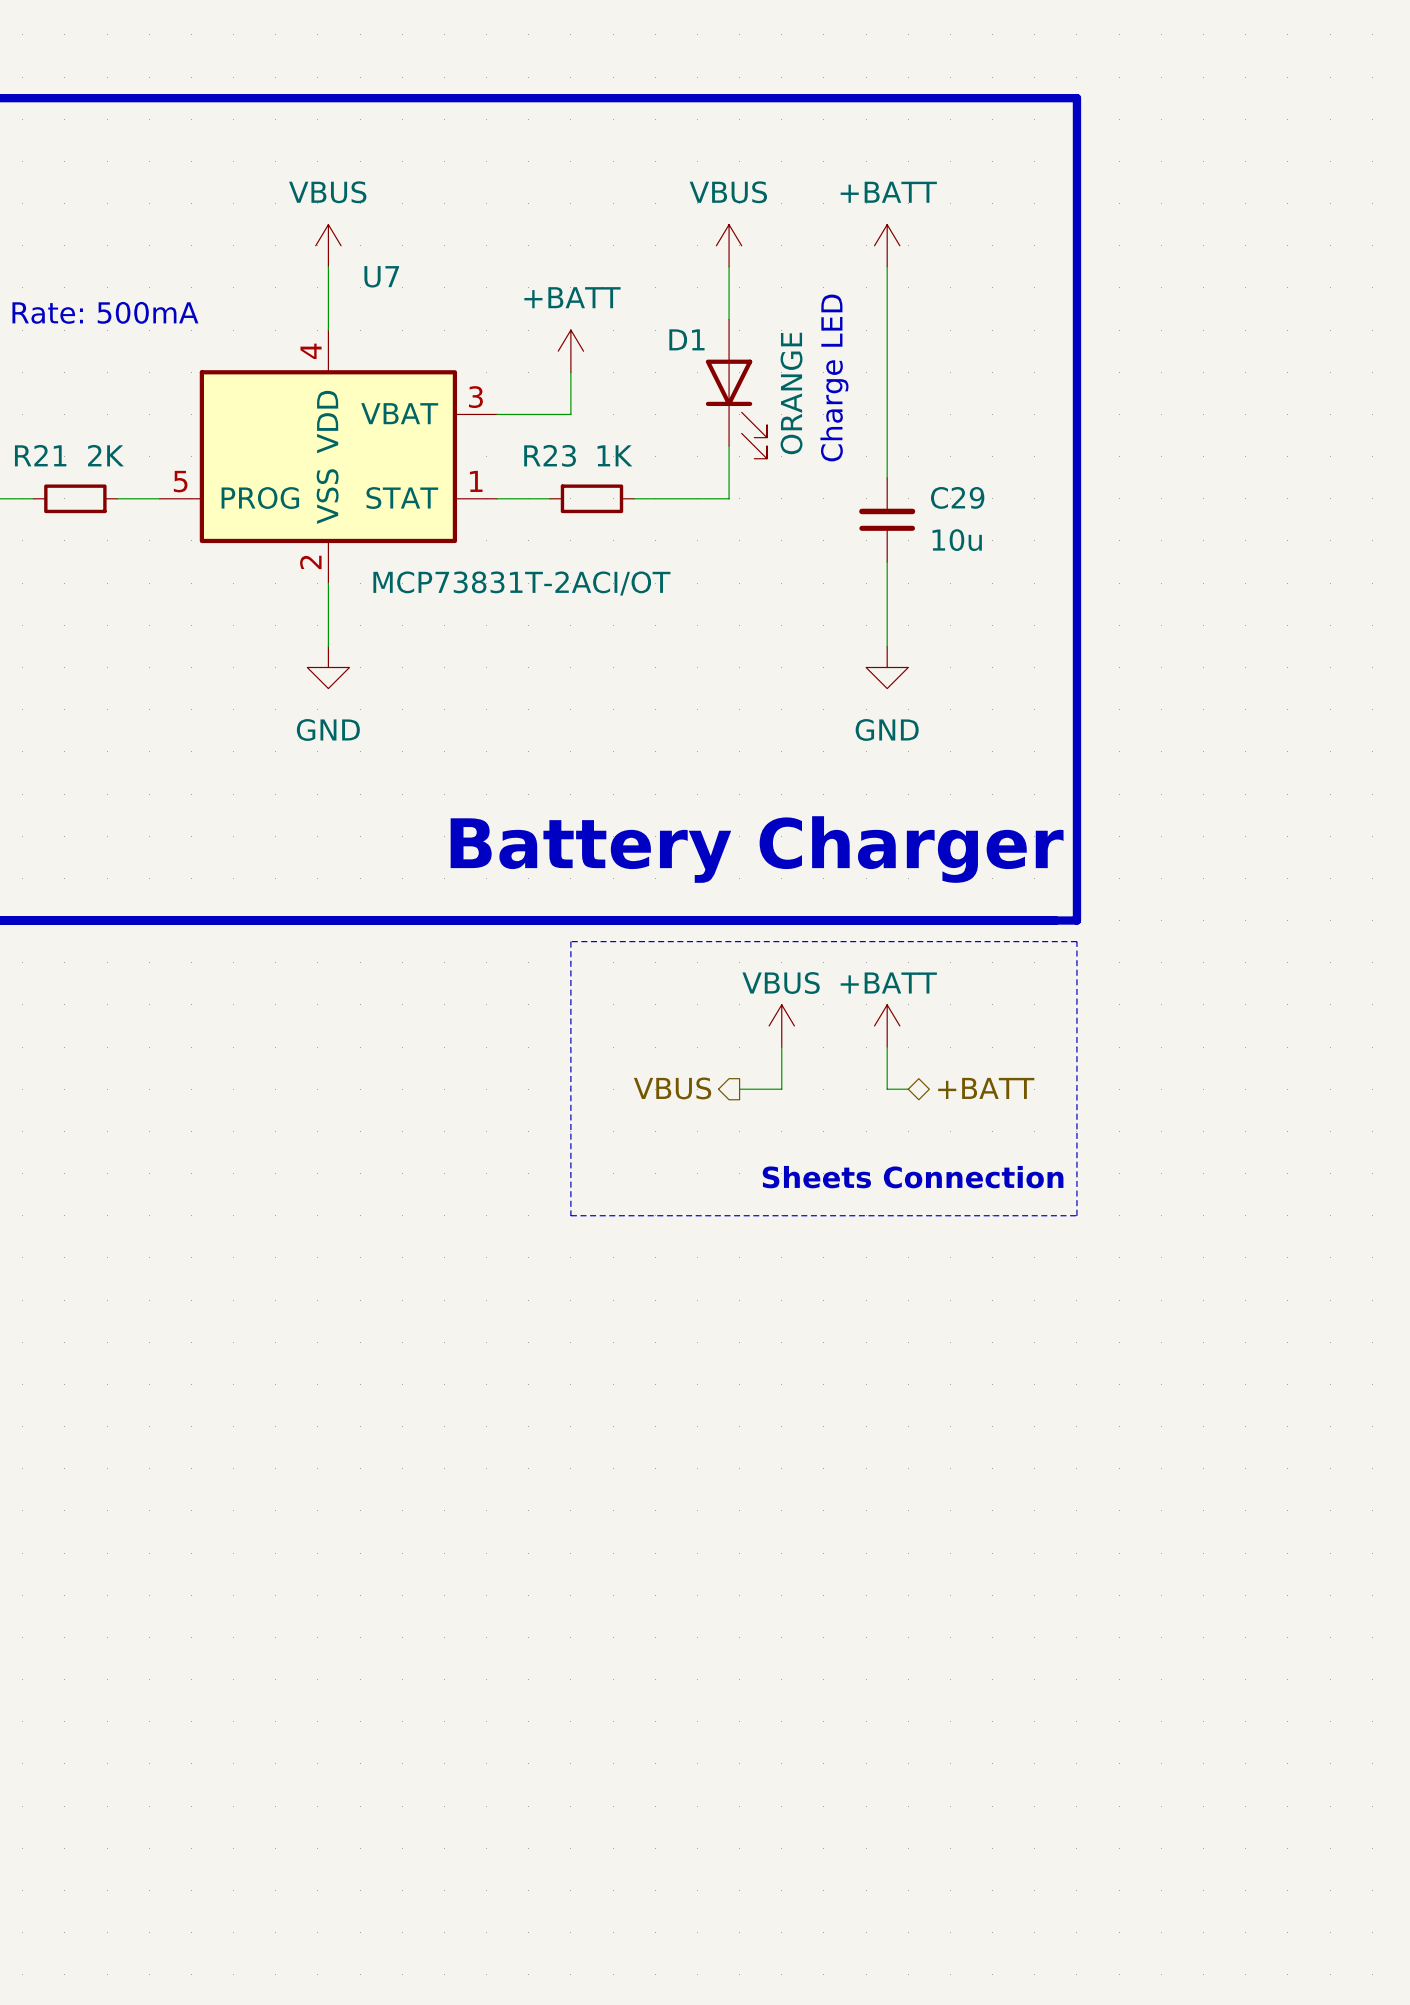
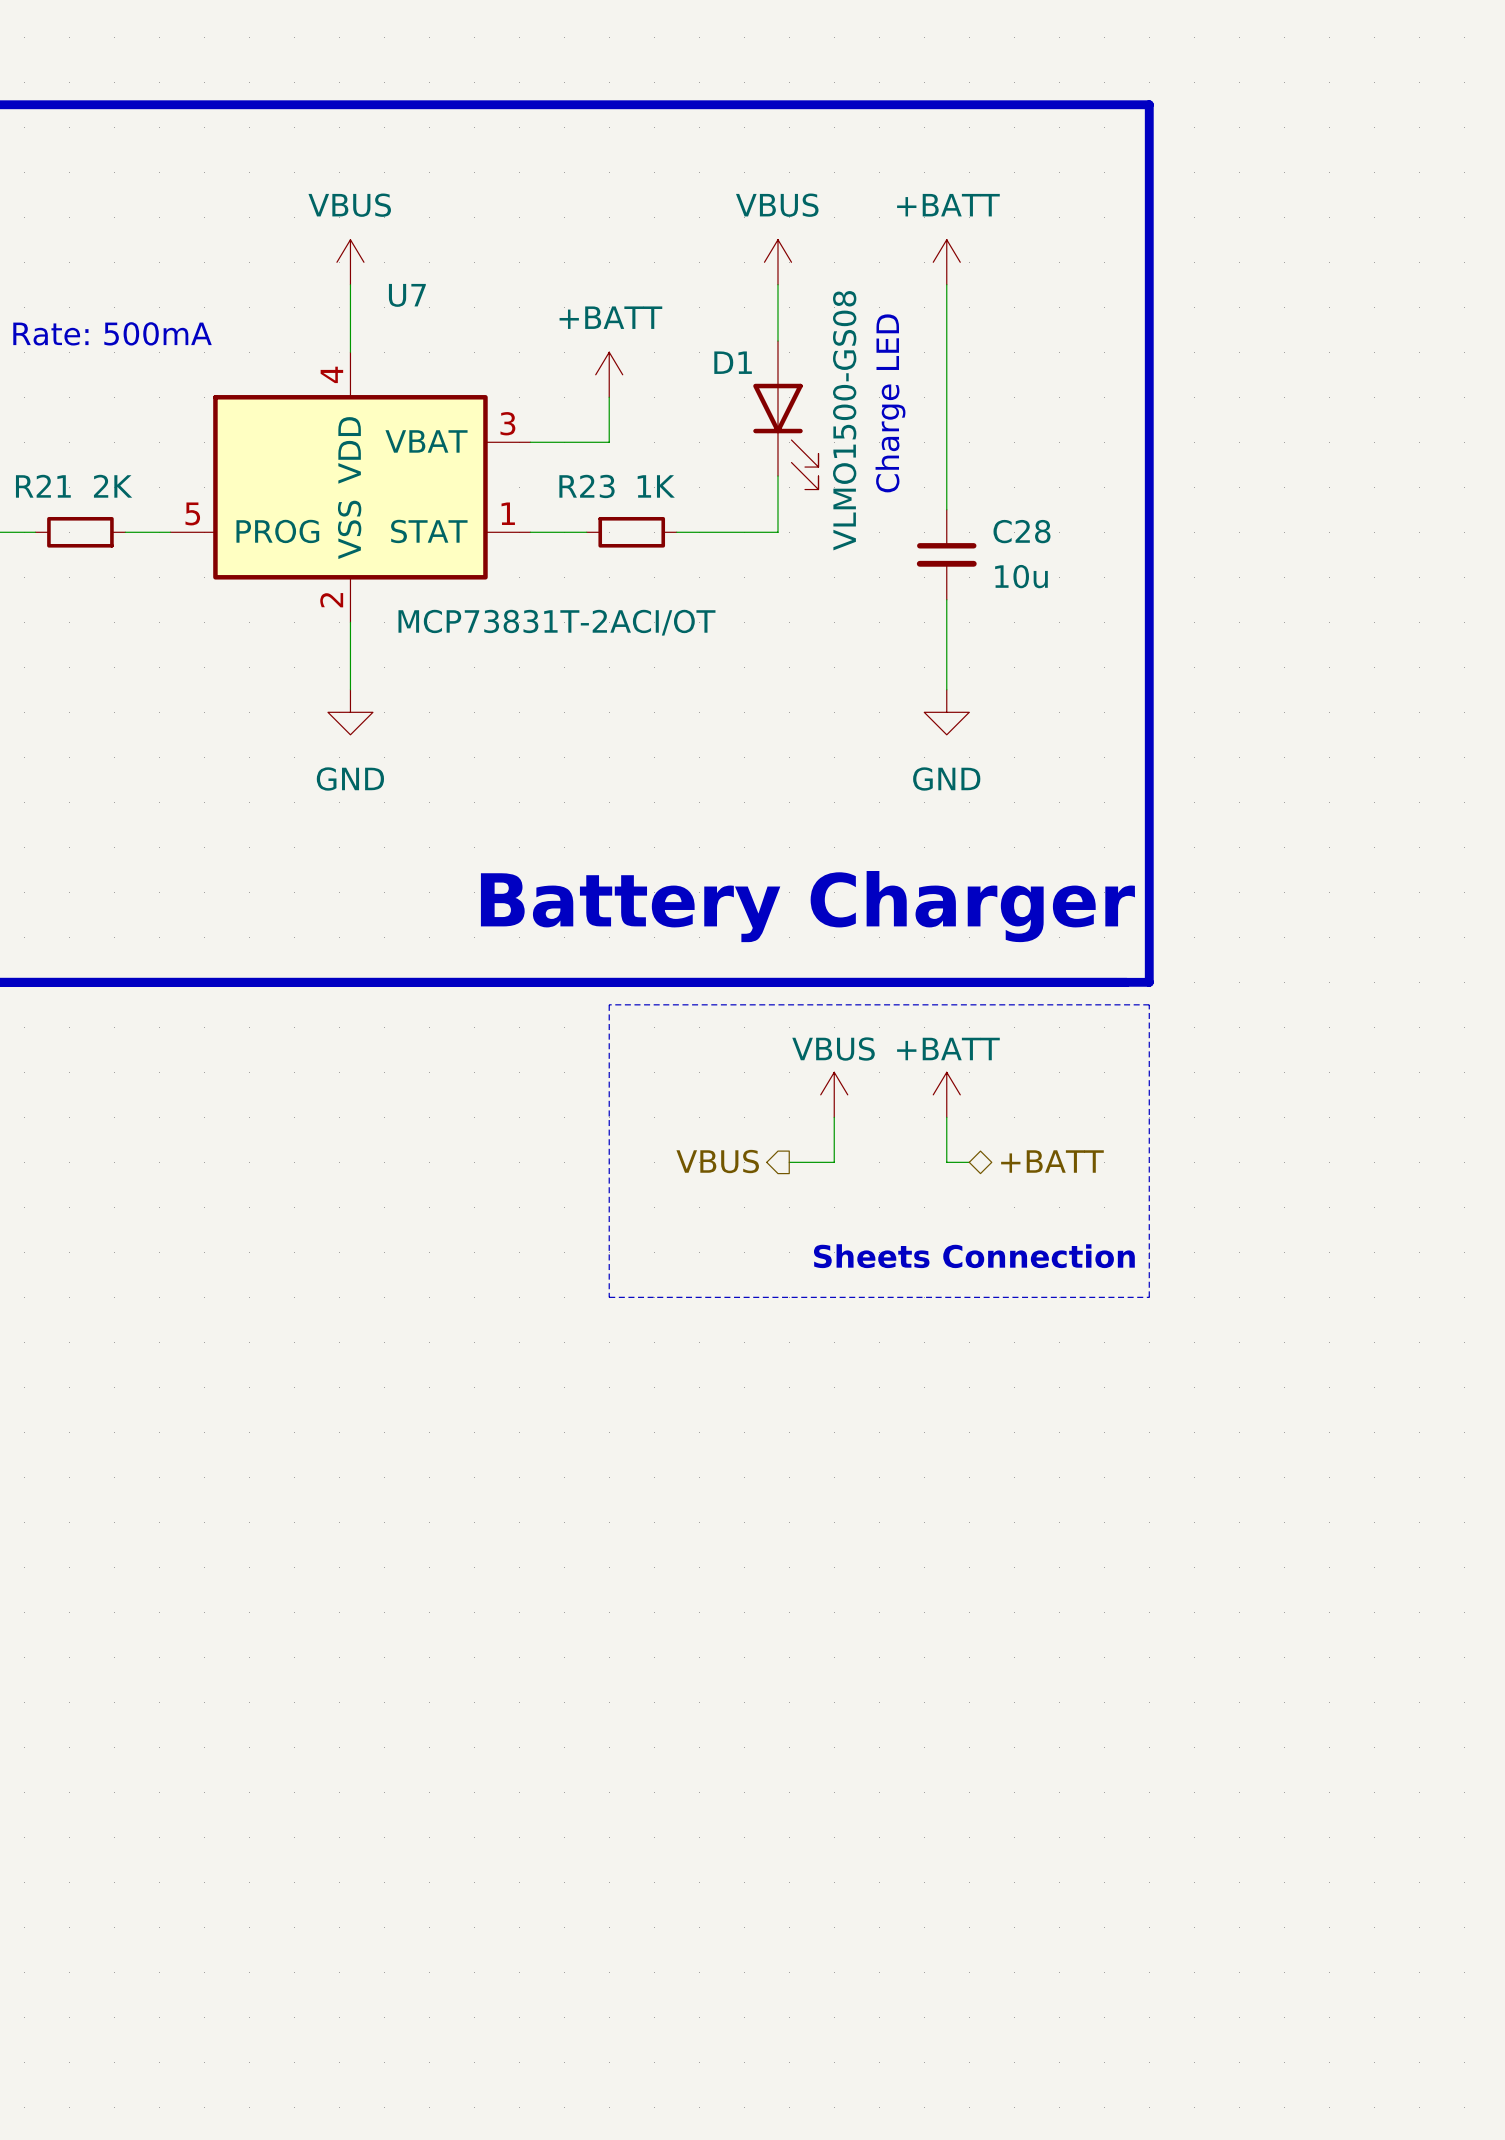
D1 value: ORANGE (791, 393) -> VLMO1500-GS08 (844, 420)
C29: 10u (887, 519) -> none
C28: none -> 10u (946, 554)

